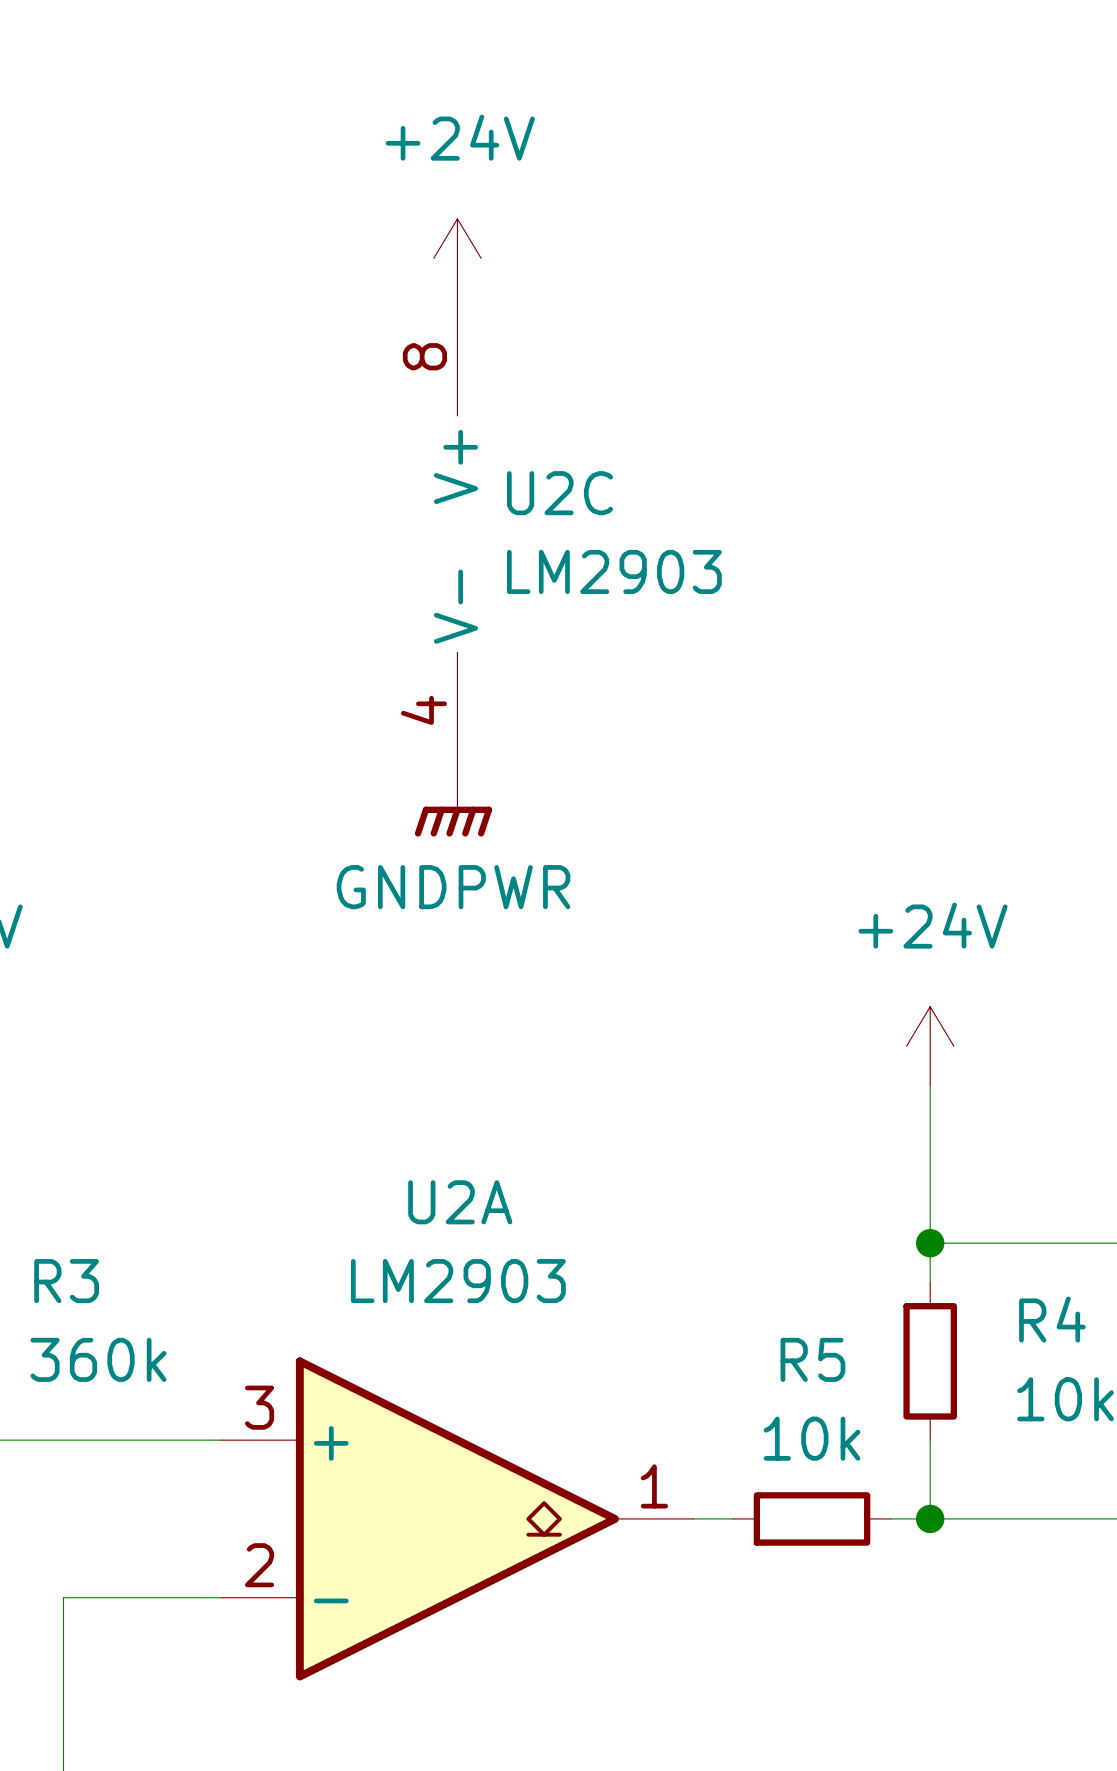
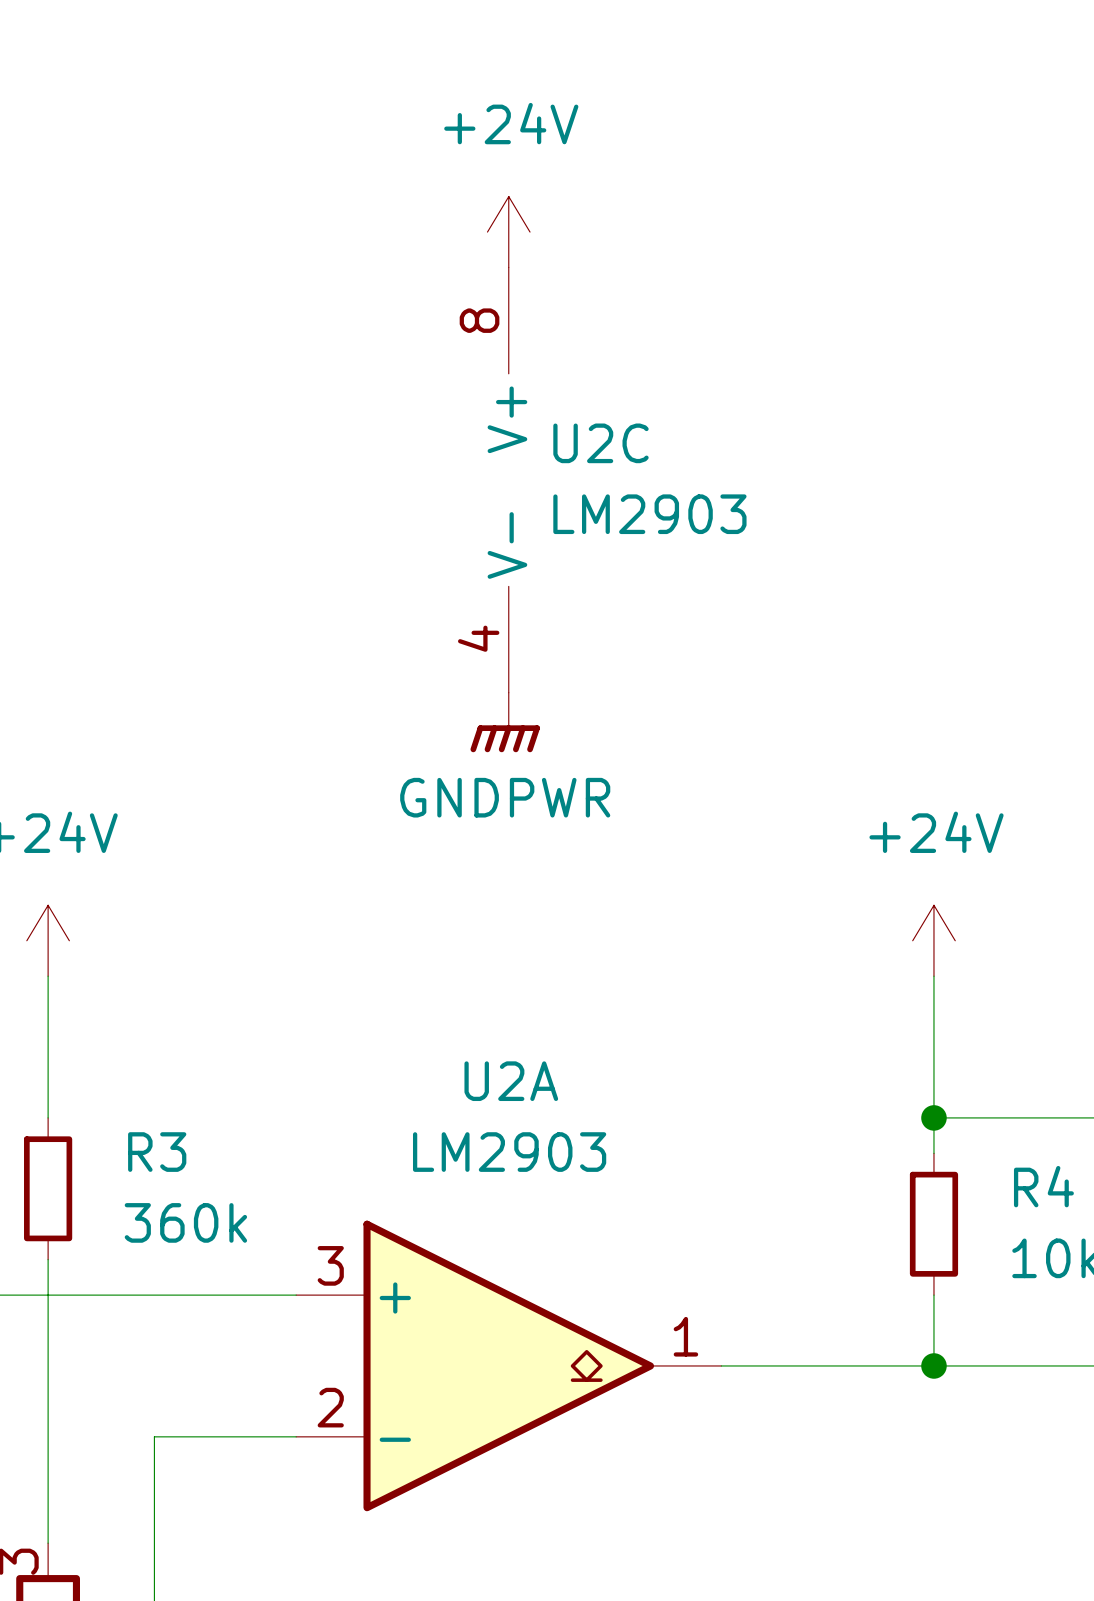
wire: none -> (756, 1365) (898, 1365)
R5: 10k (812, 1518) -> none

